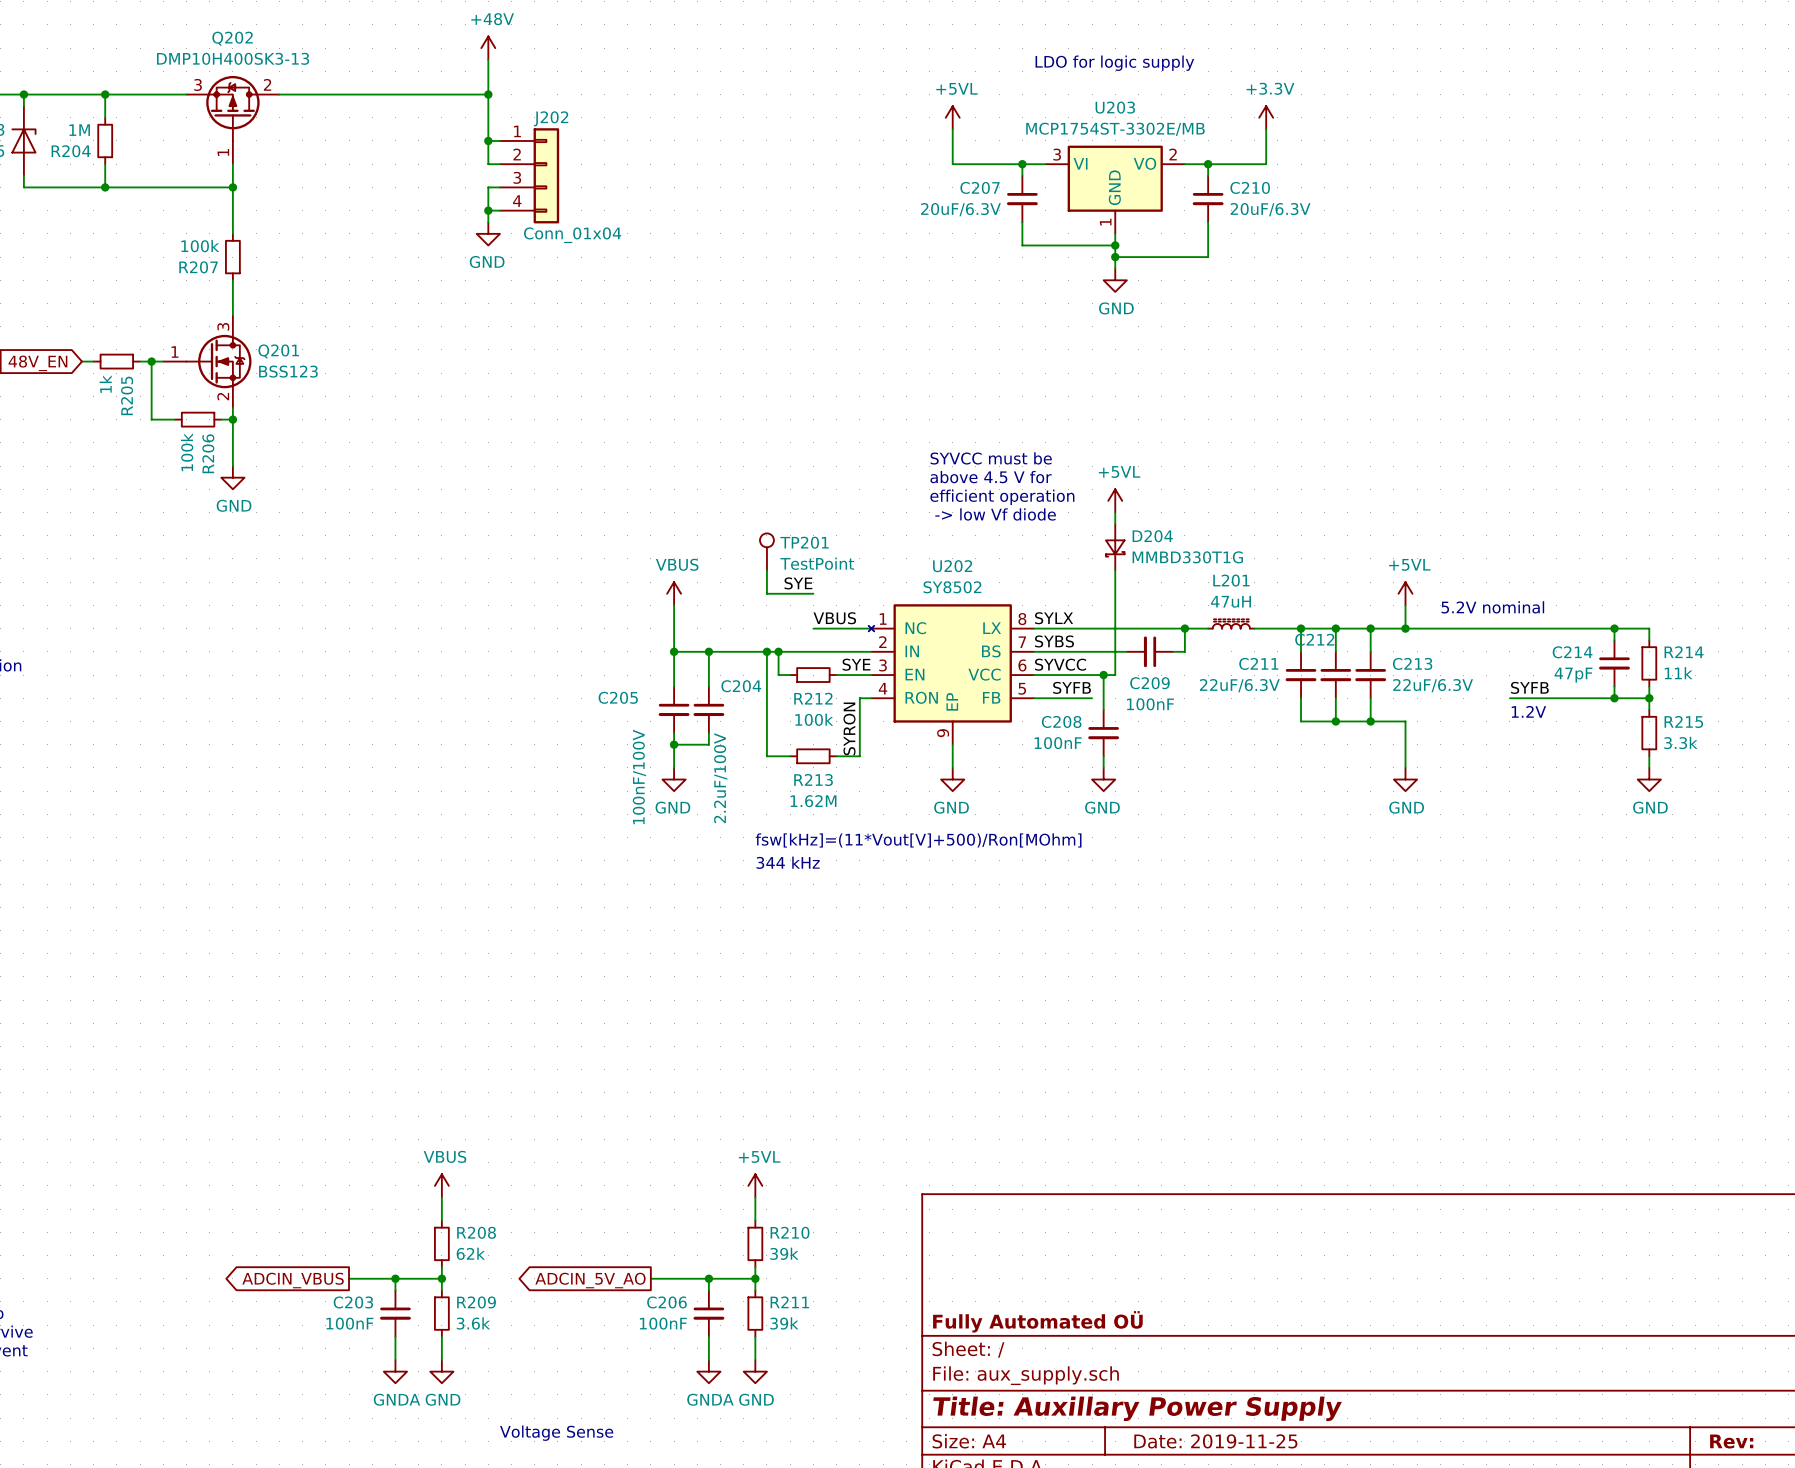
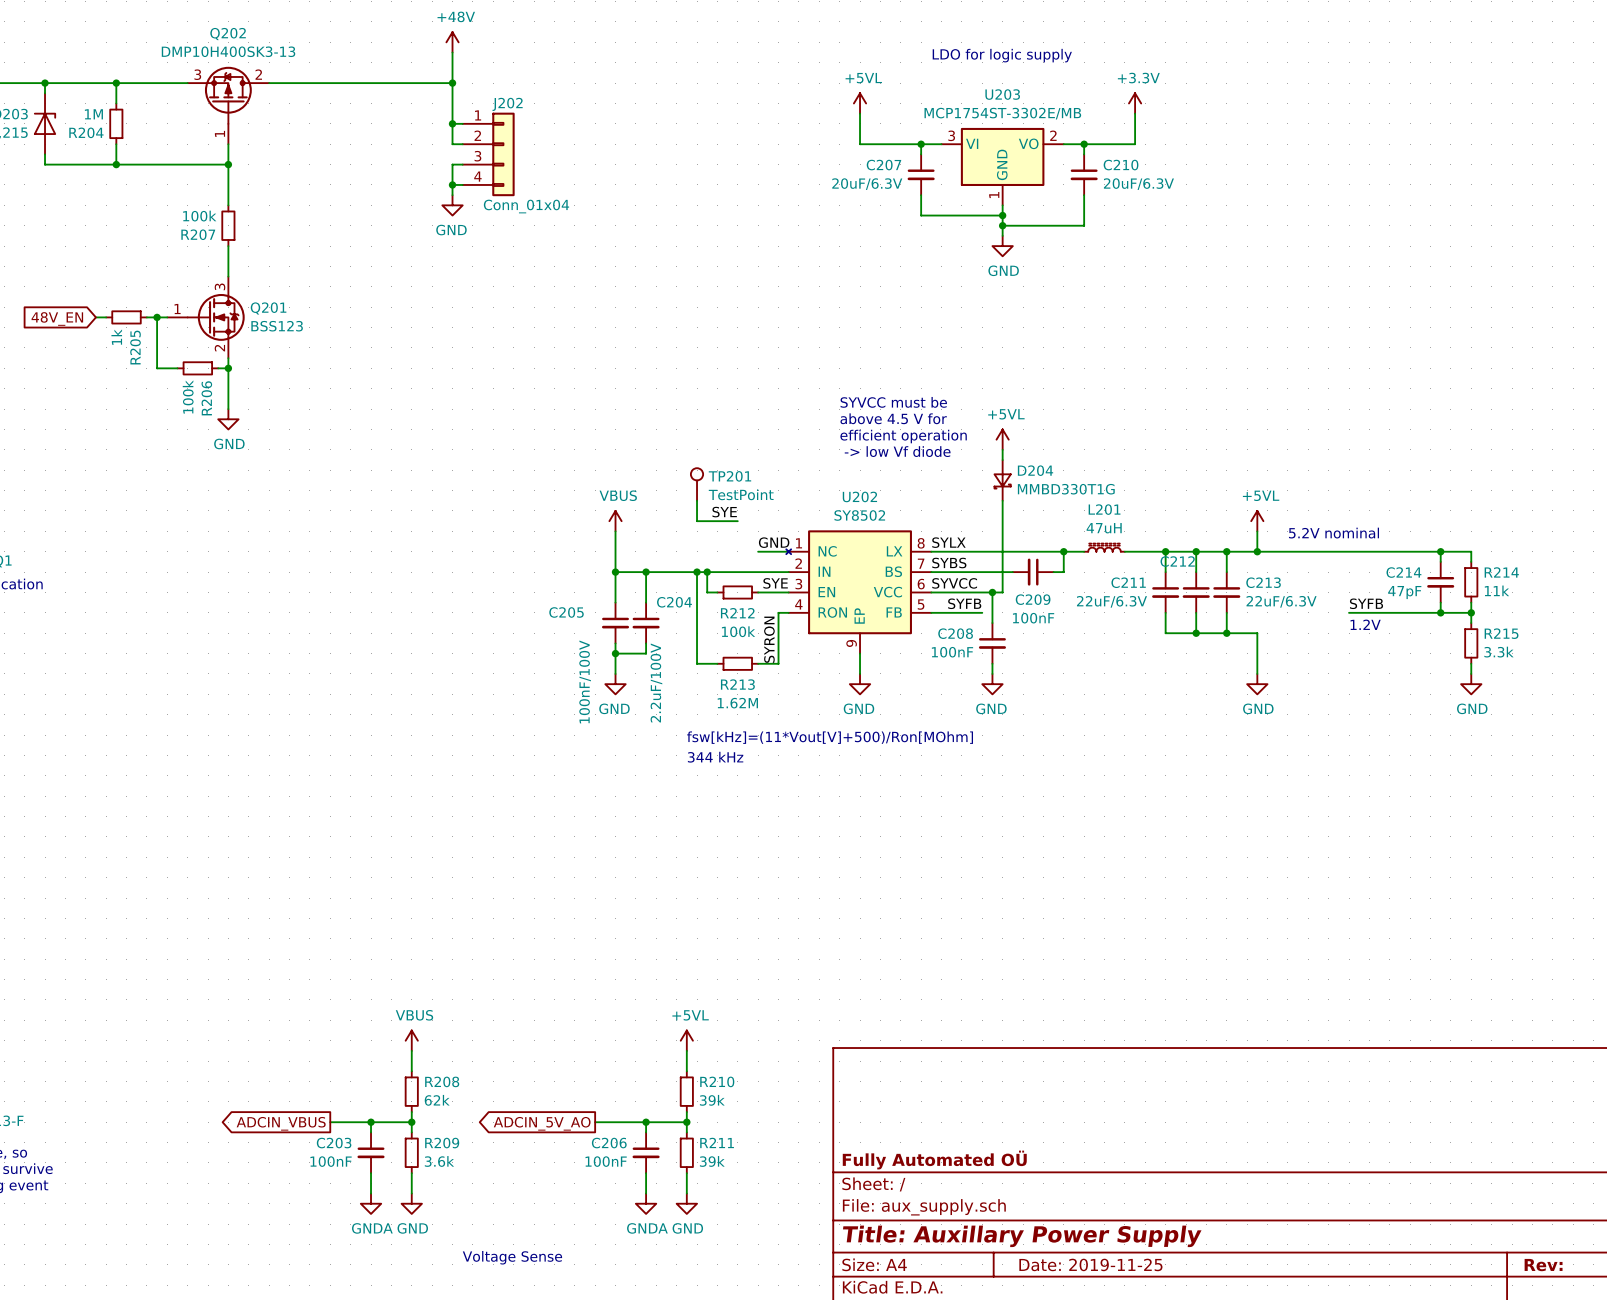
label: VBUS (834, 618) -> none
label: none -> GND (774, 542)
wire: (813, 628) (836, 628) -> none

